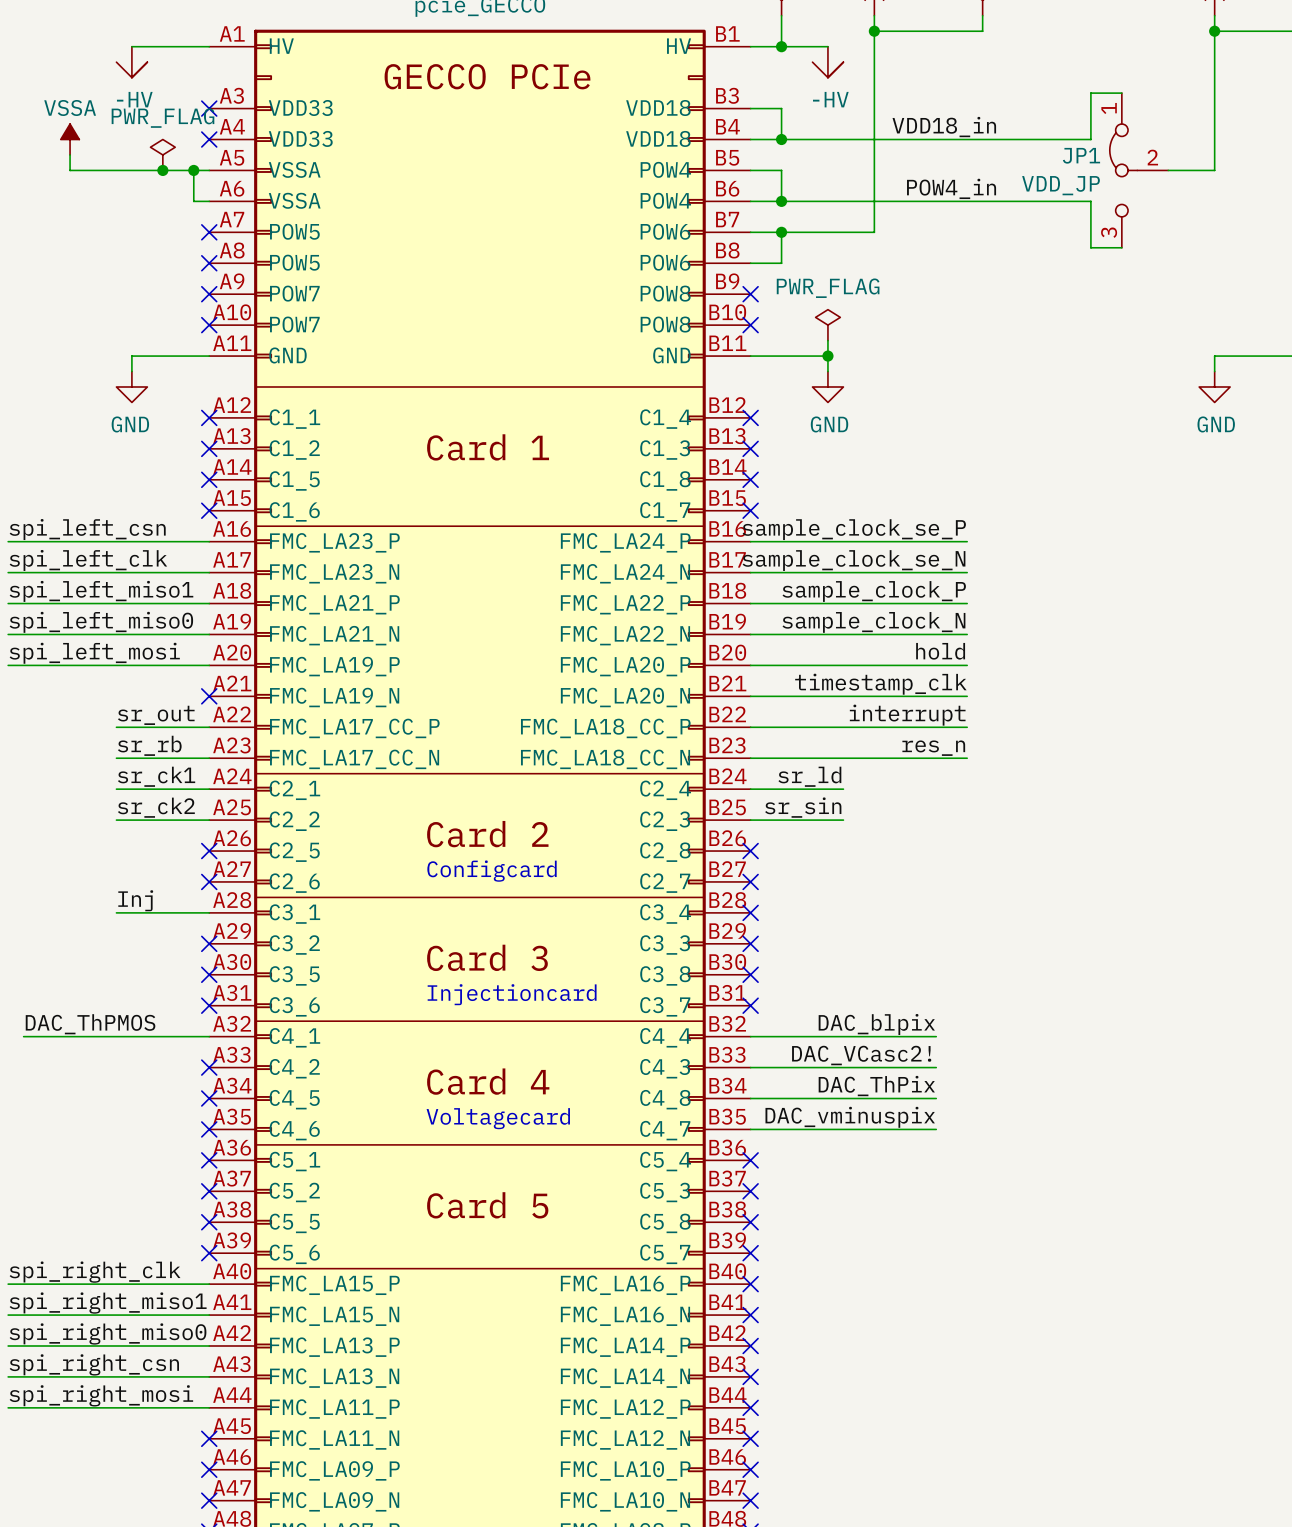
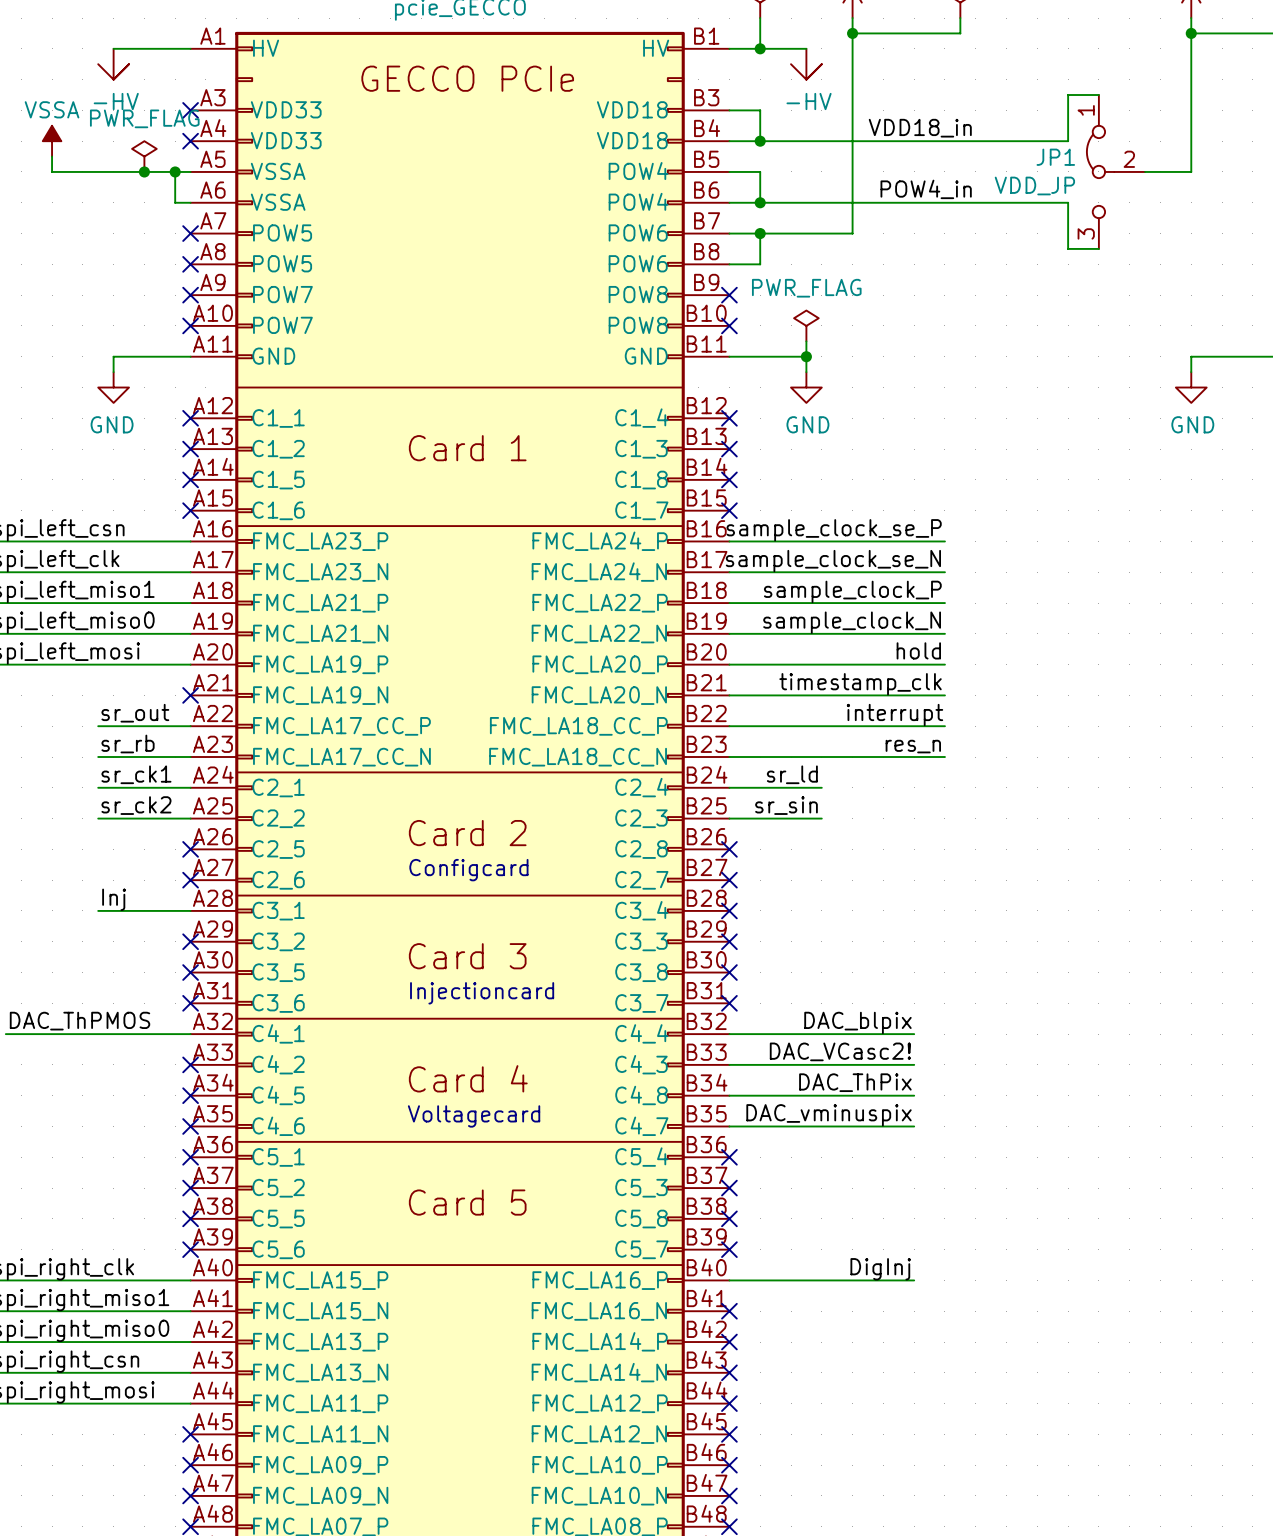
label: none -> DigInj (880, 1269)
wire: none -> (729, 1280) (914, 1280)
no-connect mark: (750, 1284) -> none

